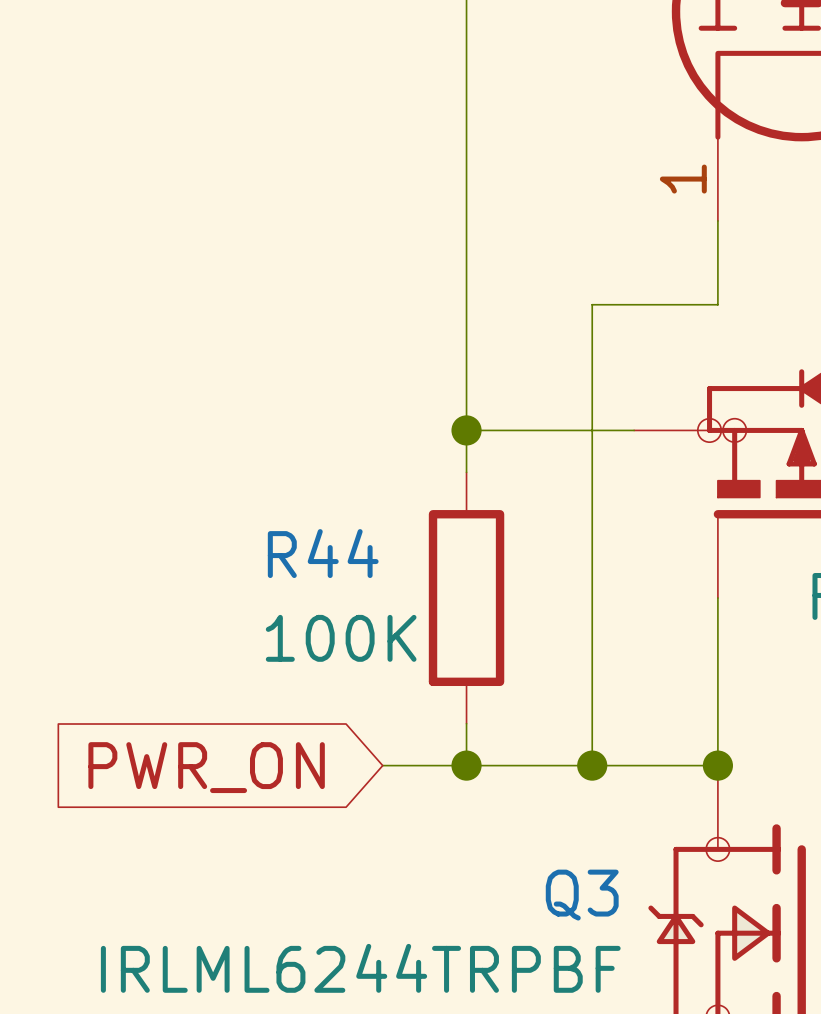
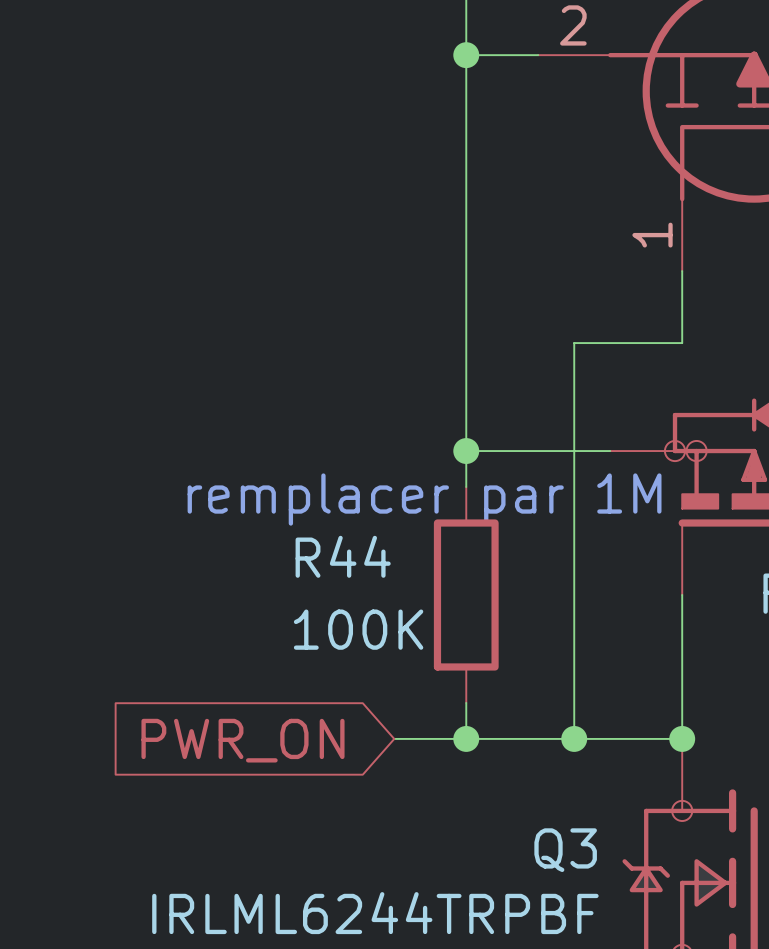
text: none -> remplacer par 1M (424, 499)

